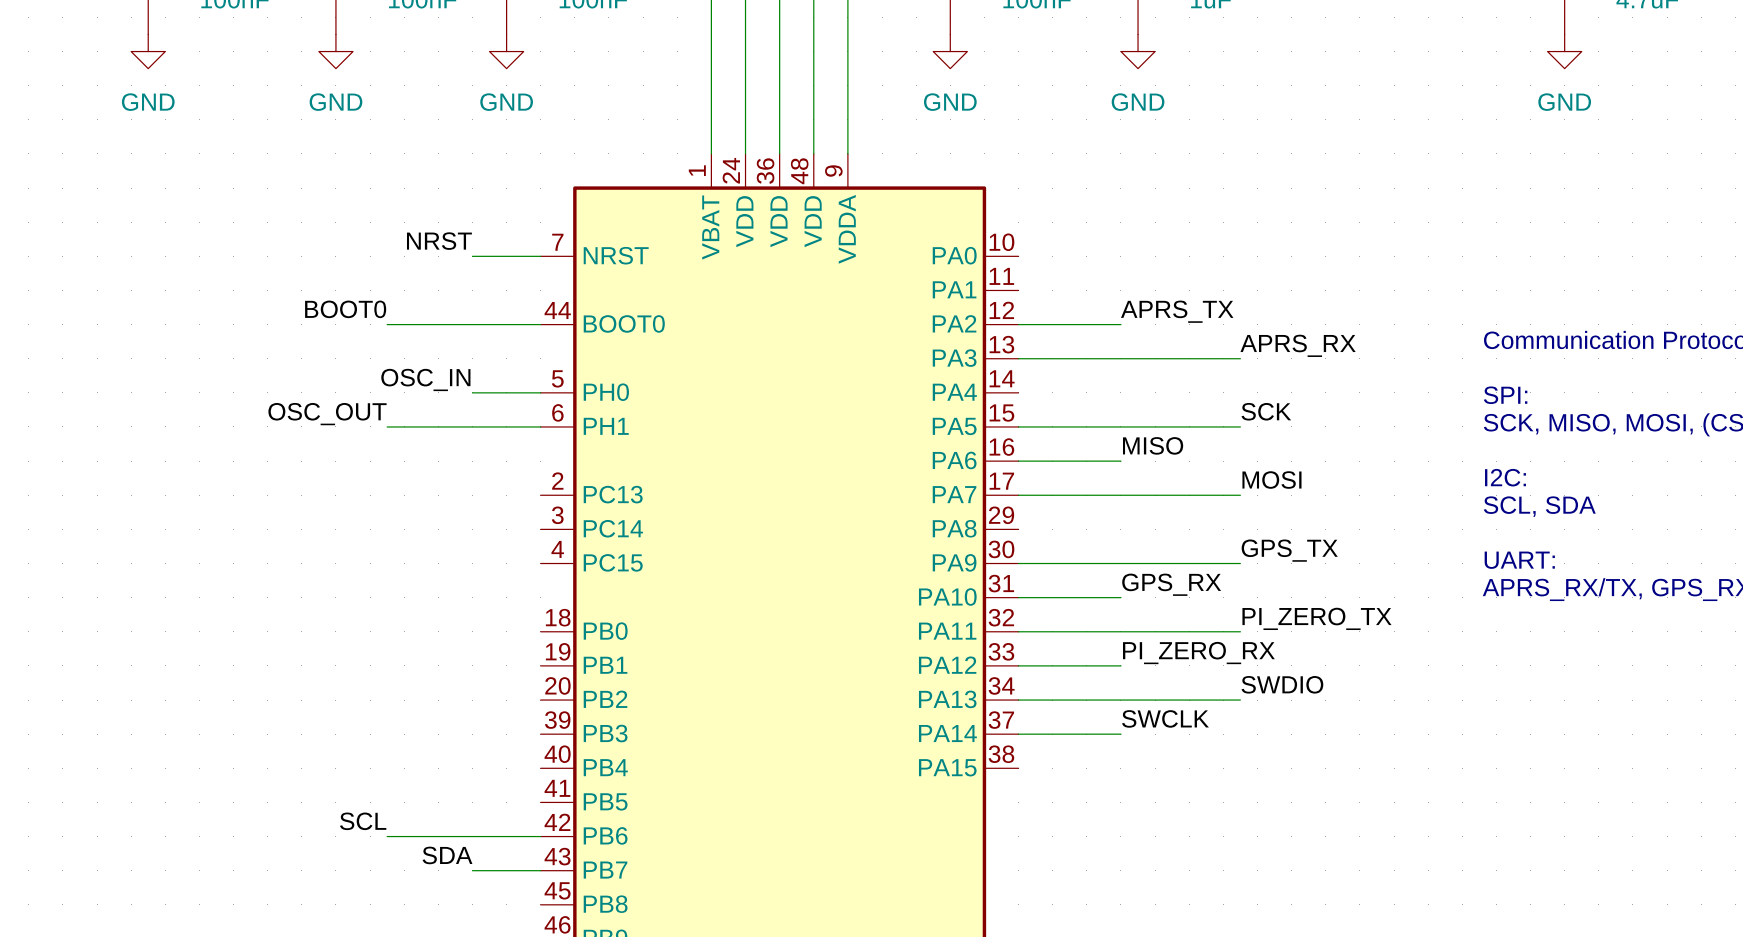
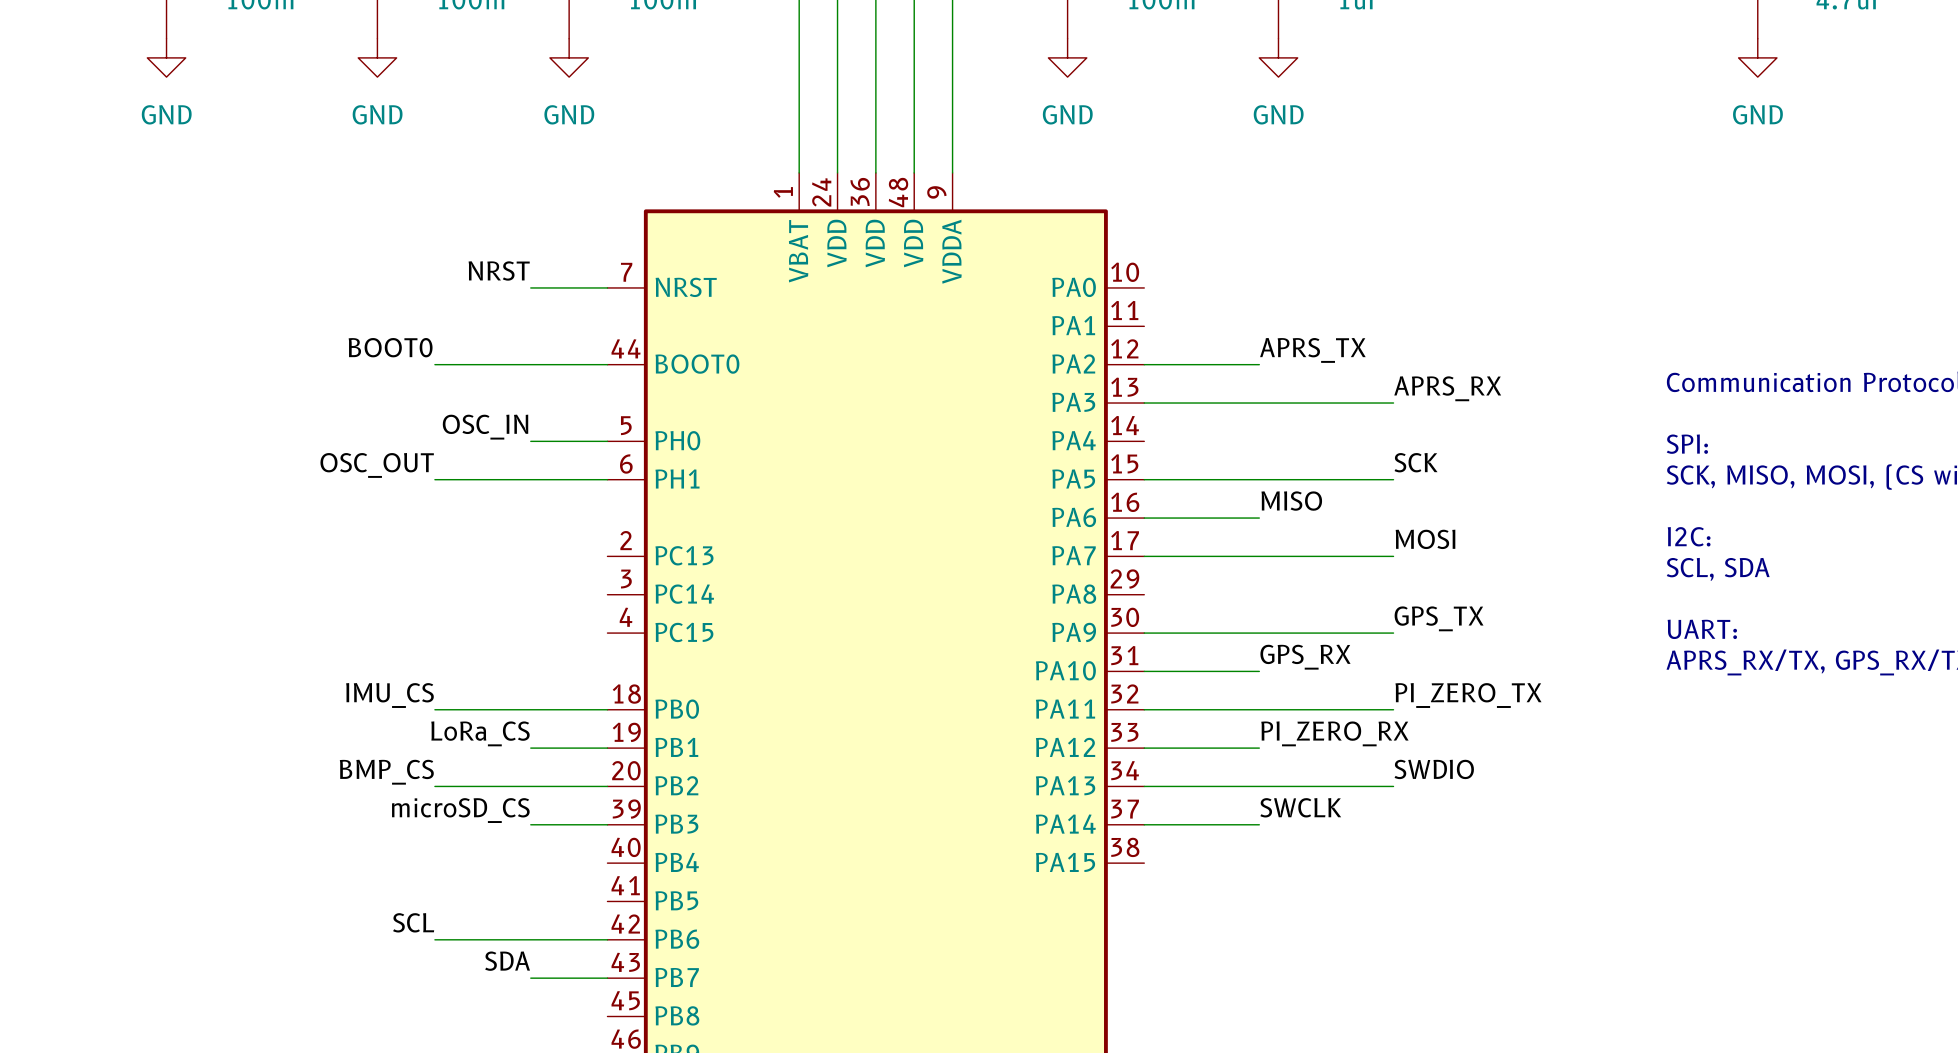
label: none -> IMU_CS (389, 695)
wire: none -> (434, 709) (607, 709)
label: none -> LoRa_CS (480, 733)
wire: none -> (530, 748) (607, 748)
label: none -> BMP_CS (386, 772)
wire: none -> (434, 786) (607, 786)
label: none -> microSD_CS (460, 810)
wire: none -> (530, 824) (607, 824)

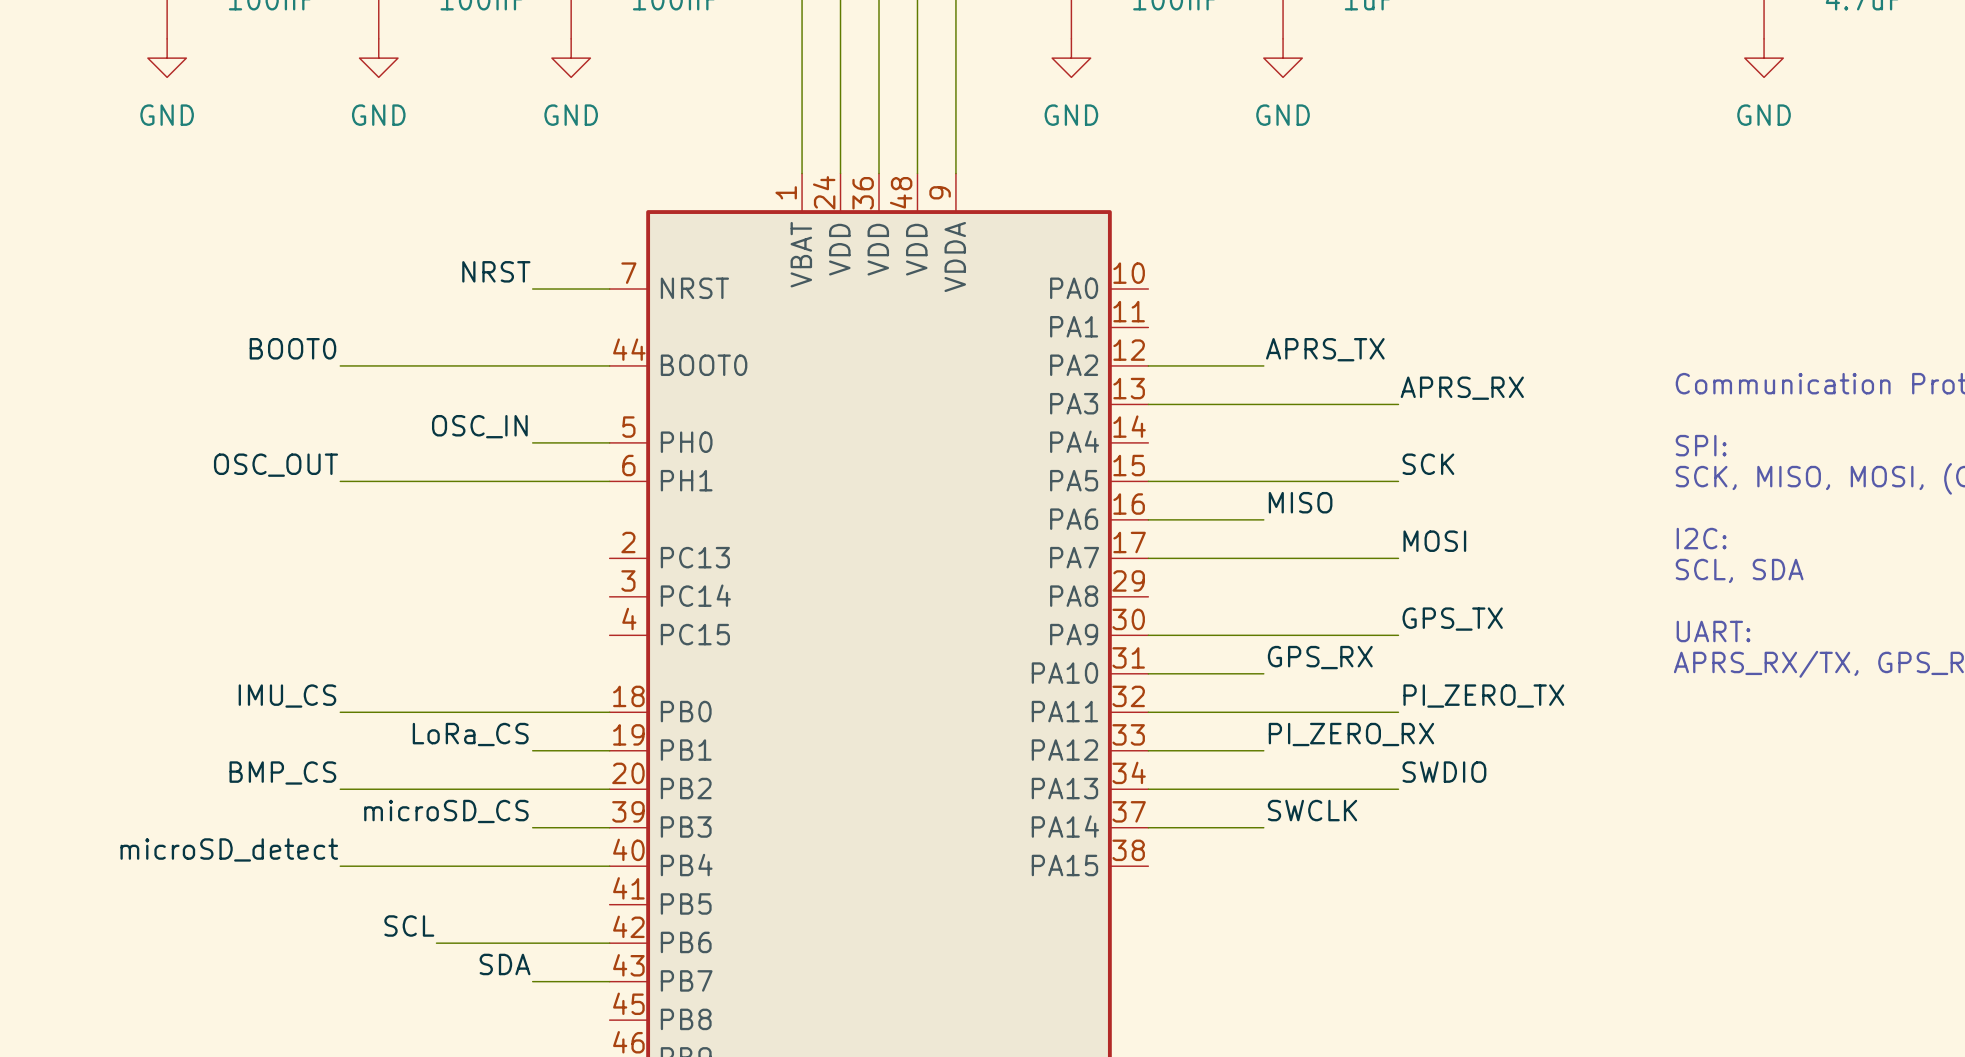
label position: BOOT0 (390, 347) -> BOOT0 (292, 348)
wire: none -> (340, 365) (436, 365)
label position: OSC_OUT (377, 465) -> OSC_OUT (276, 465)
wire: none -> (340, 481) (436, 481)
label position: IMU_CS (389, 695) -> IMU_CS (287, 696)
wire: none -> (340, 712) (436, 712)
label position: BMP_CS (386, 772) -> BMP_CS (282, 772)
wire: none -> (340, 789) (436, 789)
label: none -> microSD_detect (229, 849)
wire: none -> (340, 866) (609, 866)

